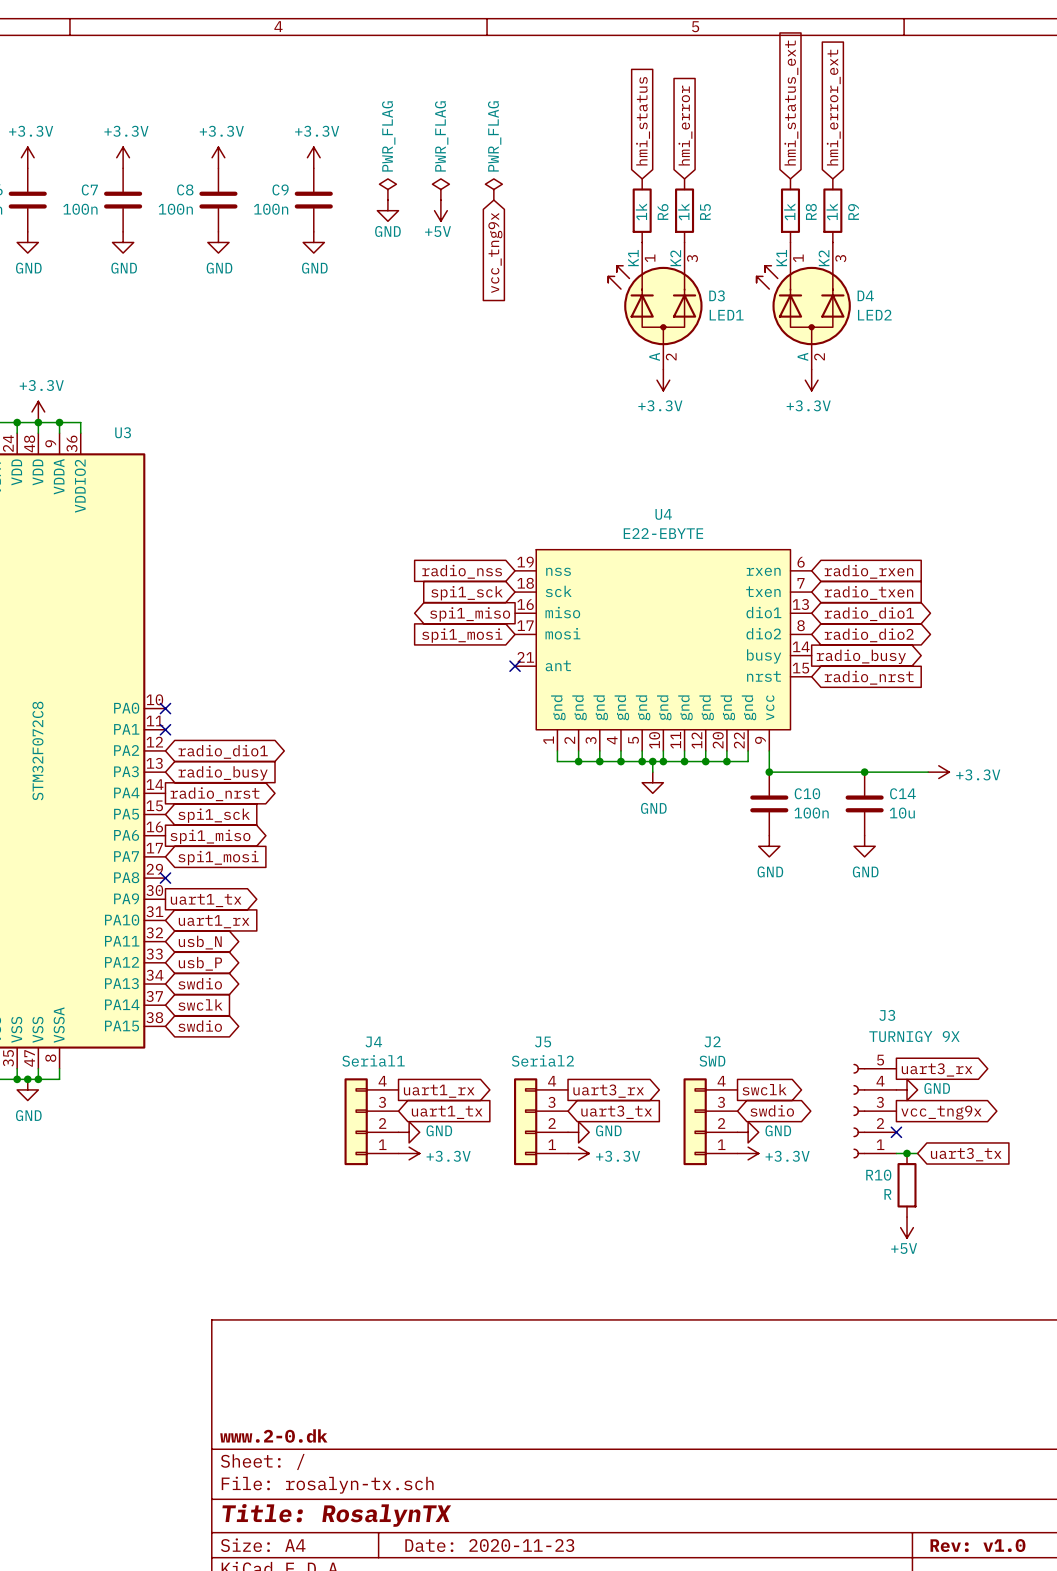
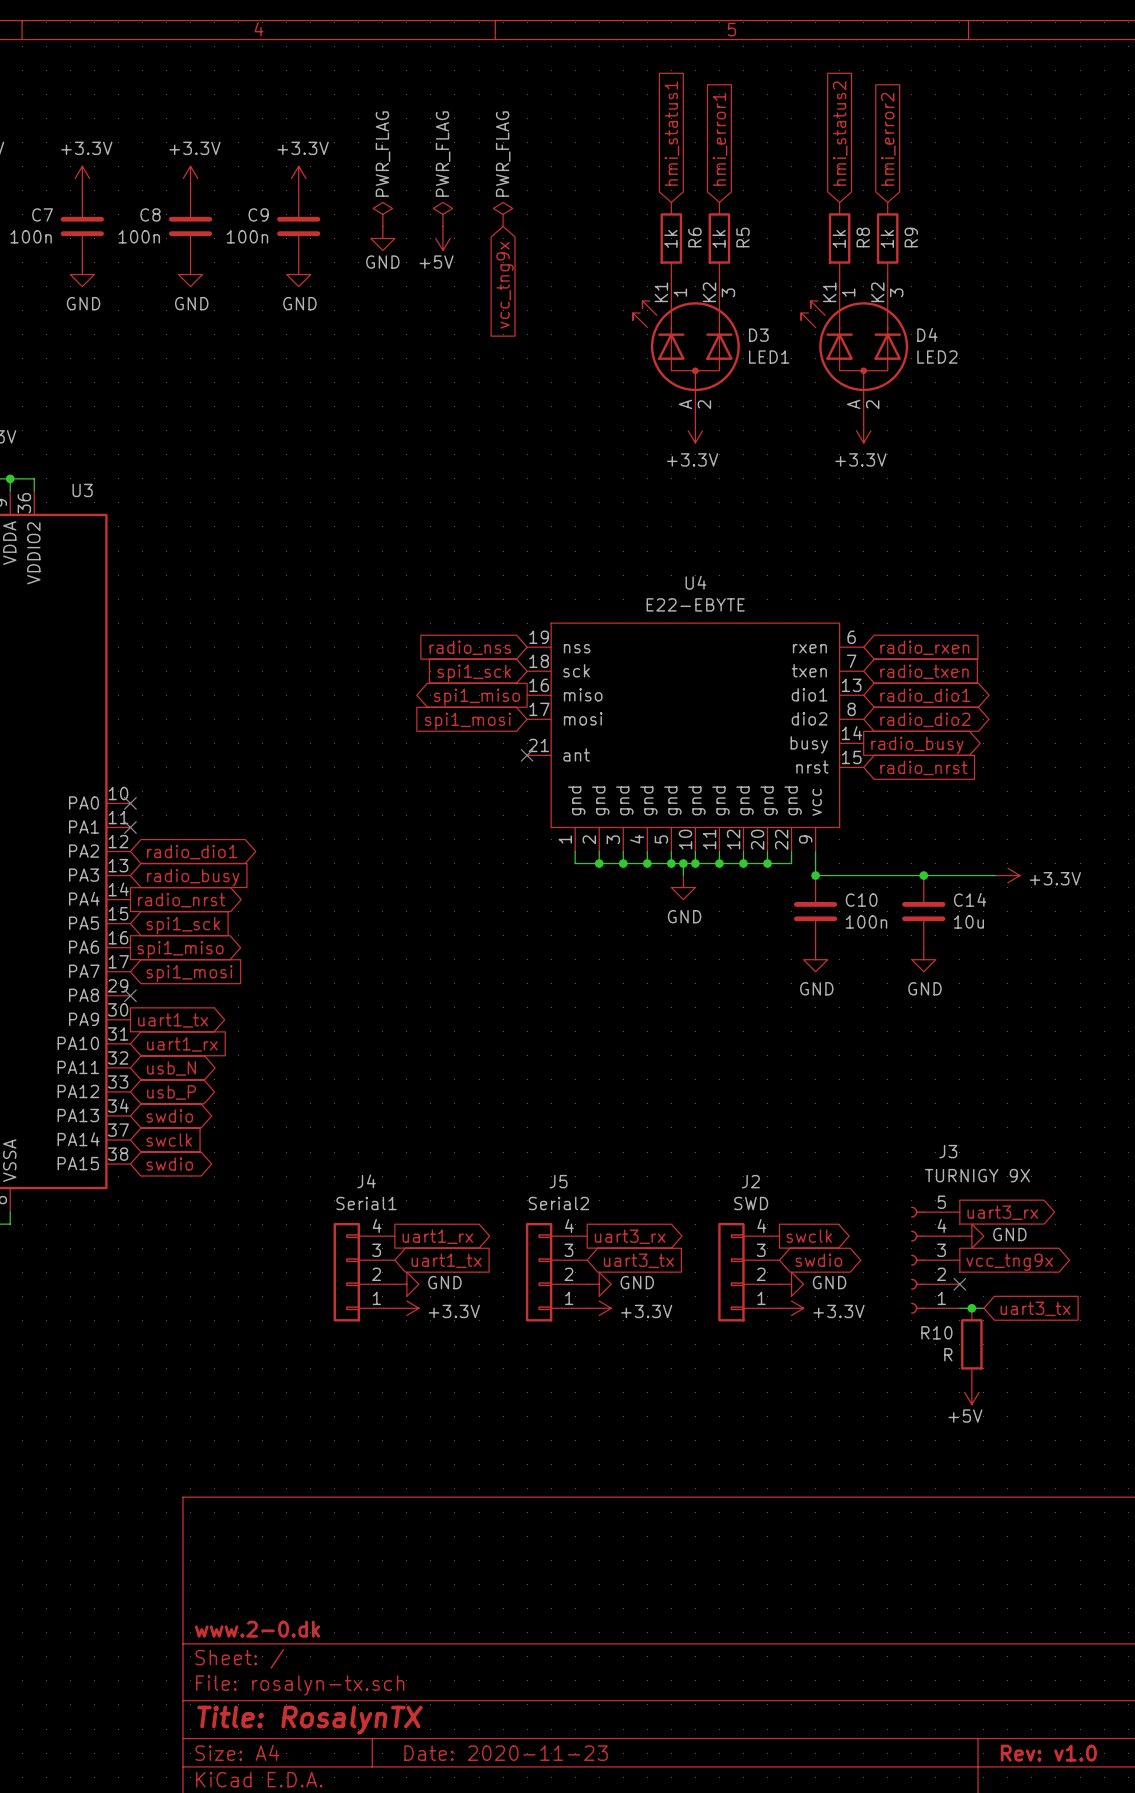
global label: hmi_status_ext (791, 103) -> hmi_status2 (840, 133)
global label: hmi_error_ext (833, 107) -> hmi_error2 (888, 139)
global label: hmi_status (643, 121) -> hmi_status1 (671, 133)
global label: hmi_error (685, 125) -> hmi_error1 (720, 139)

